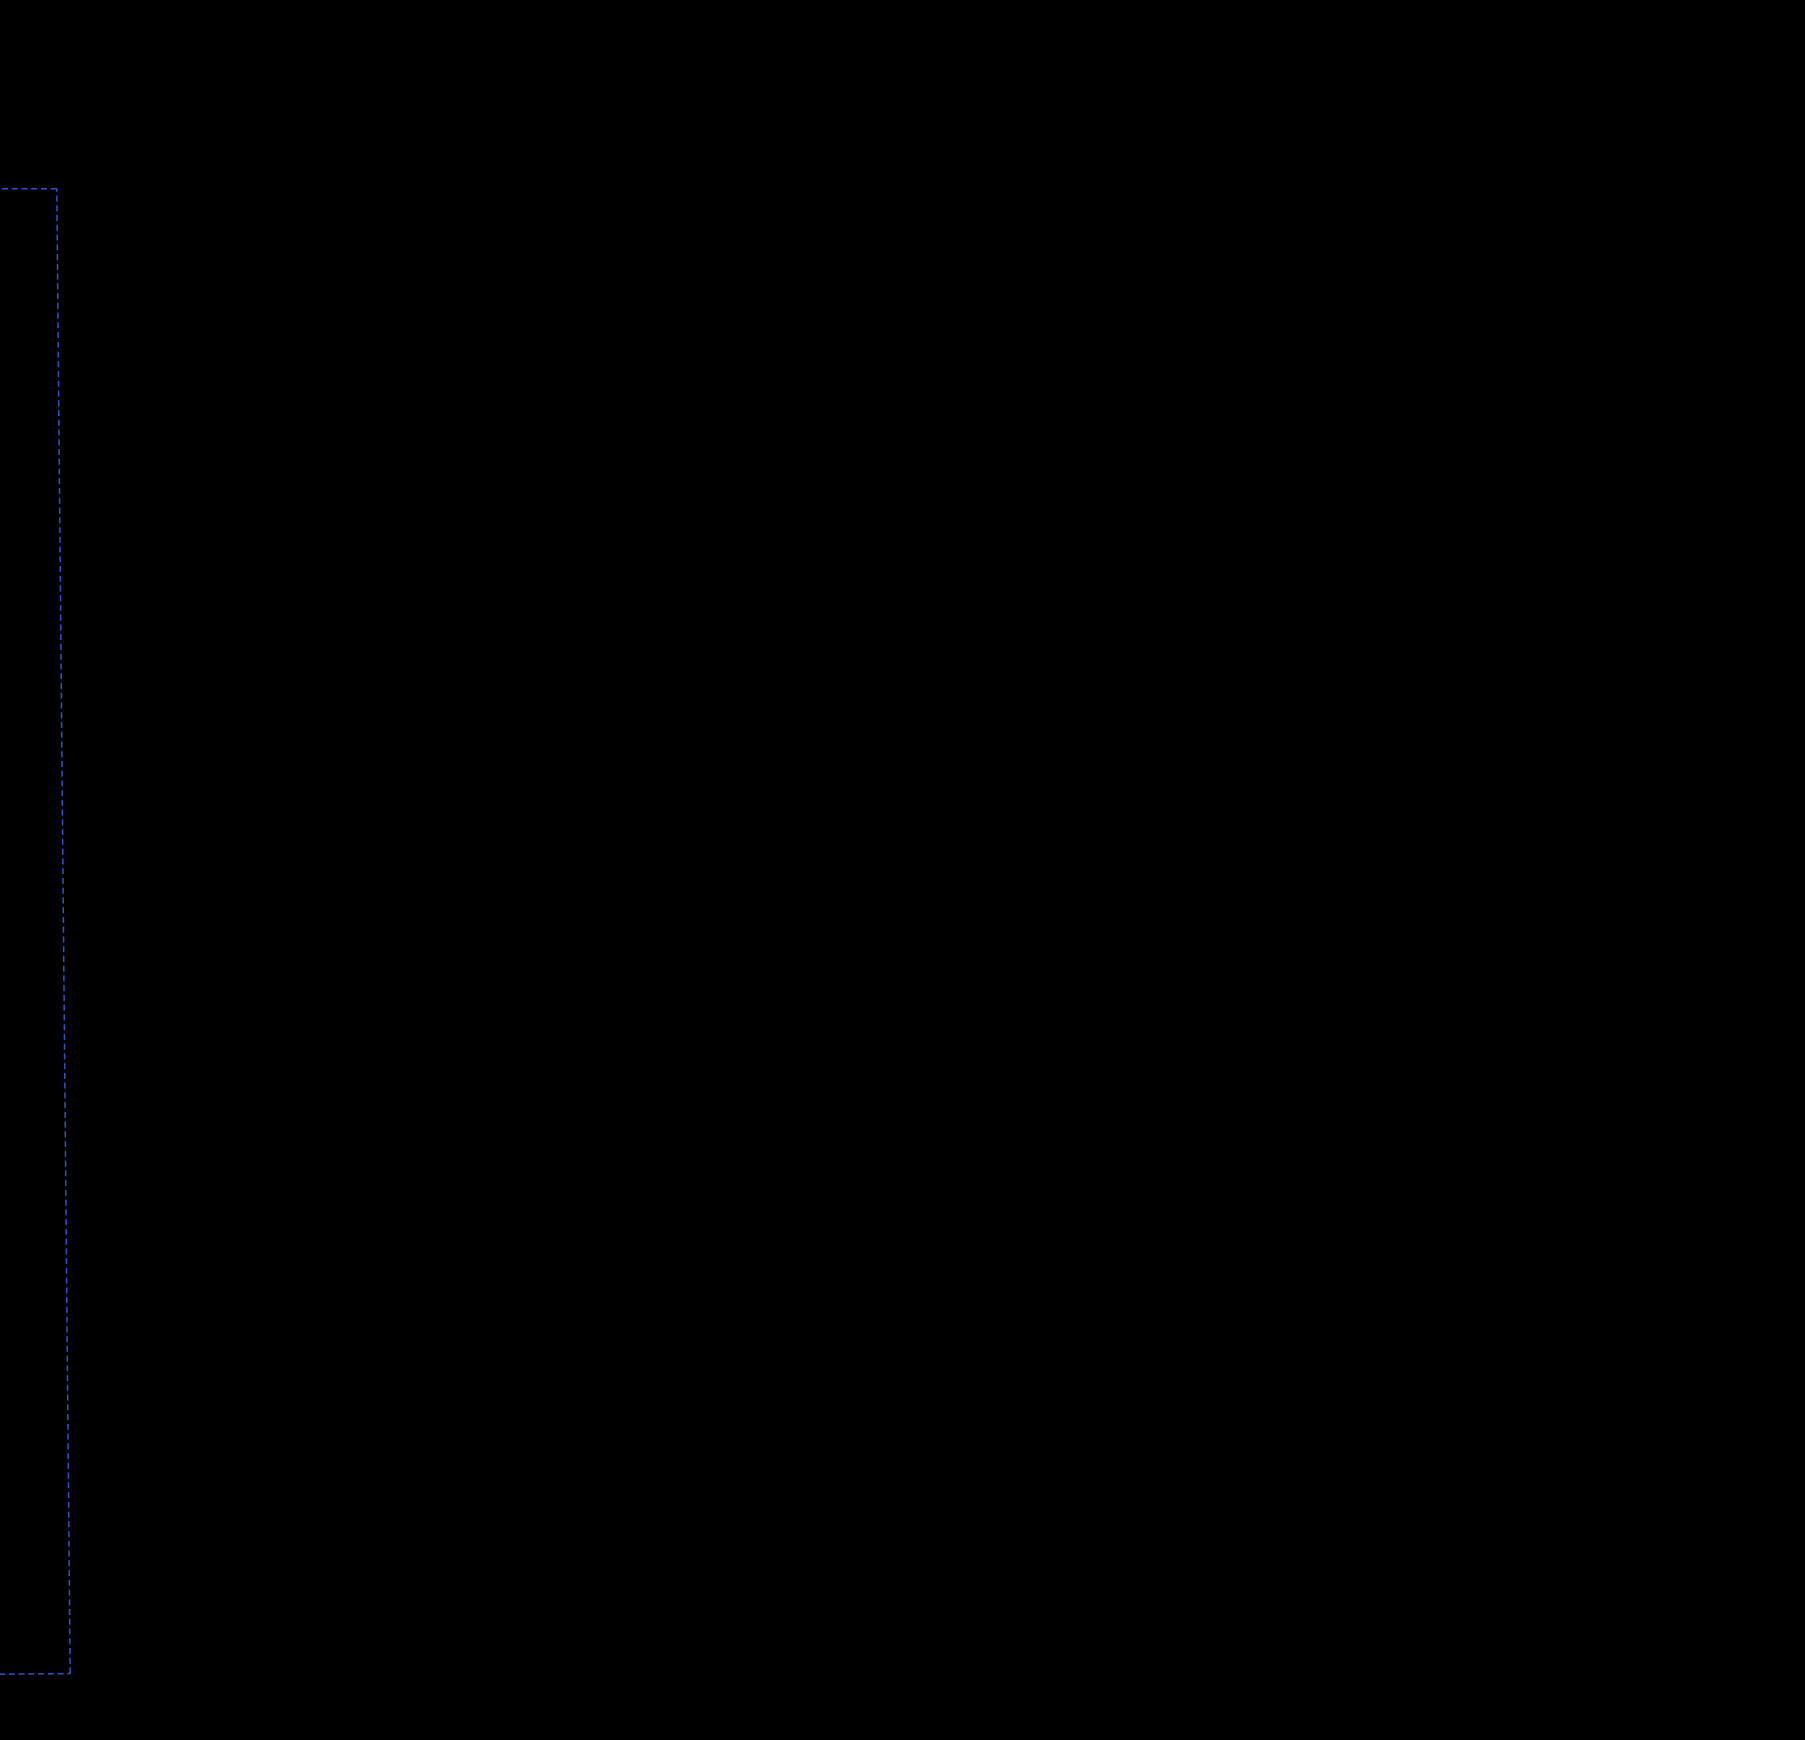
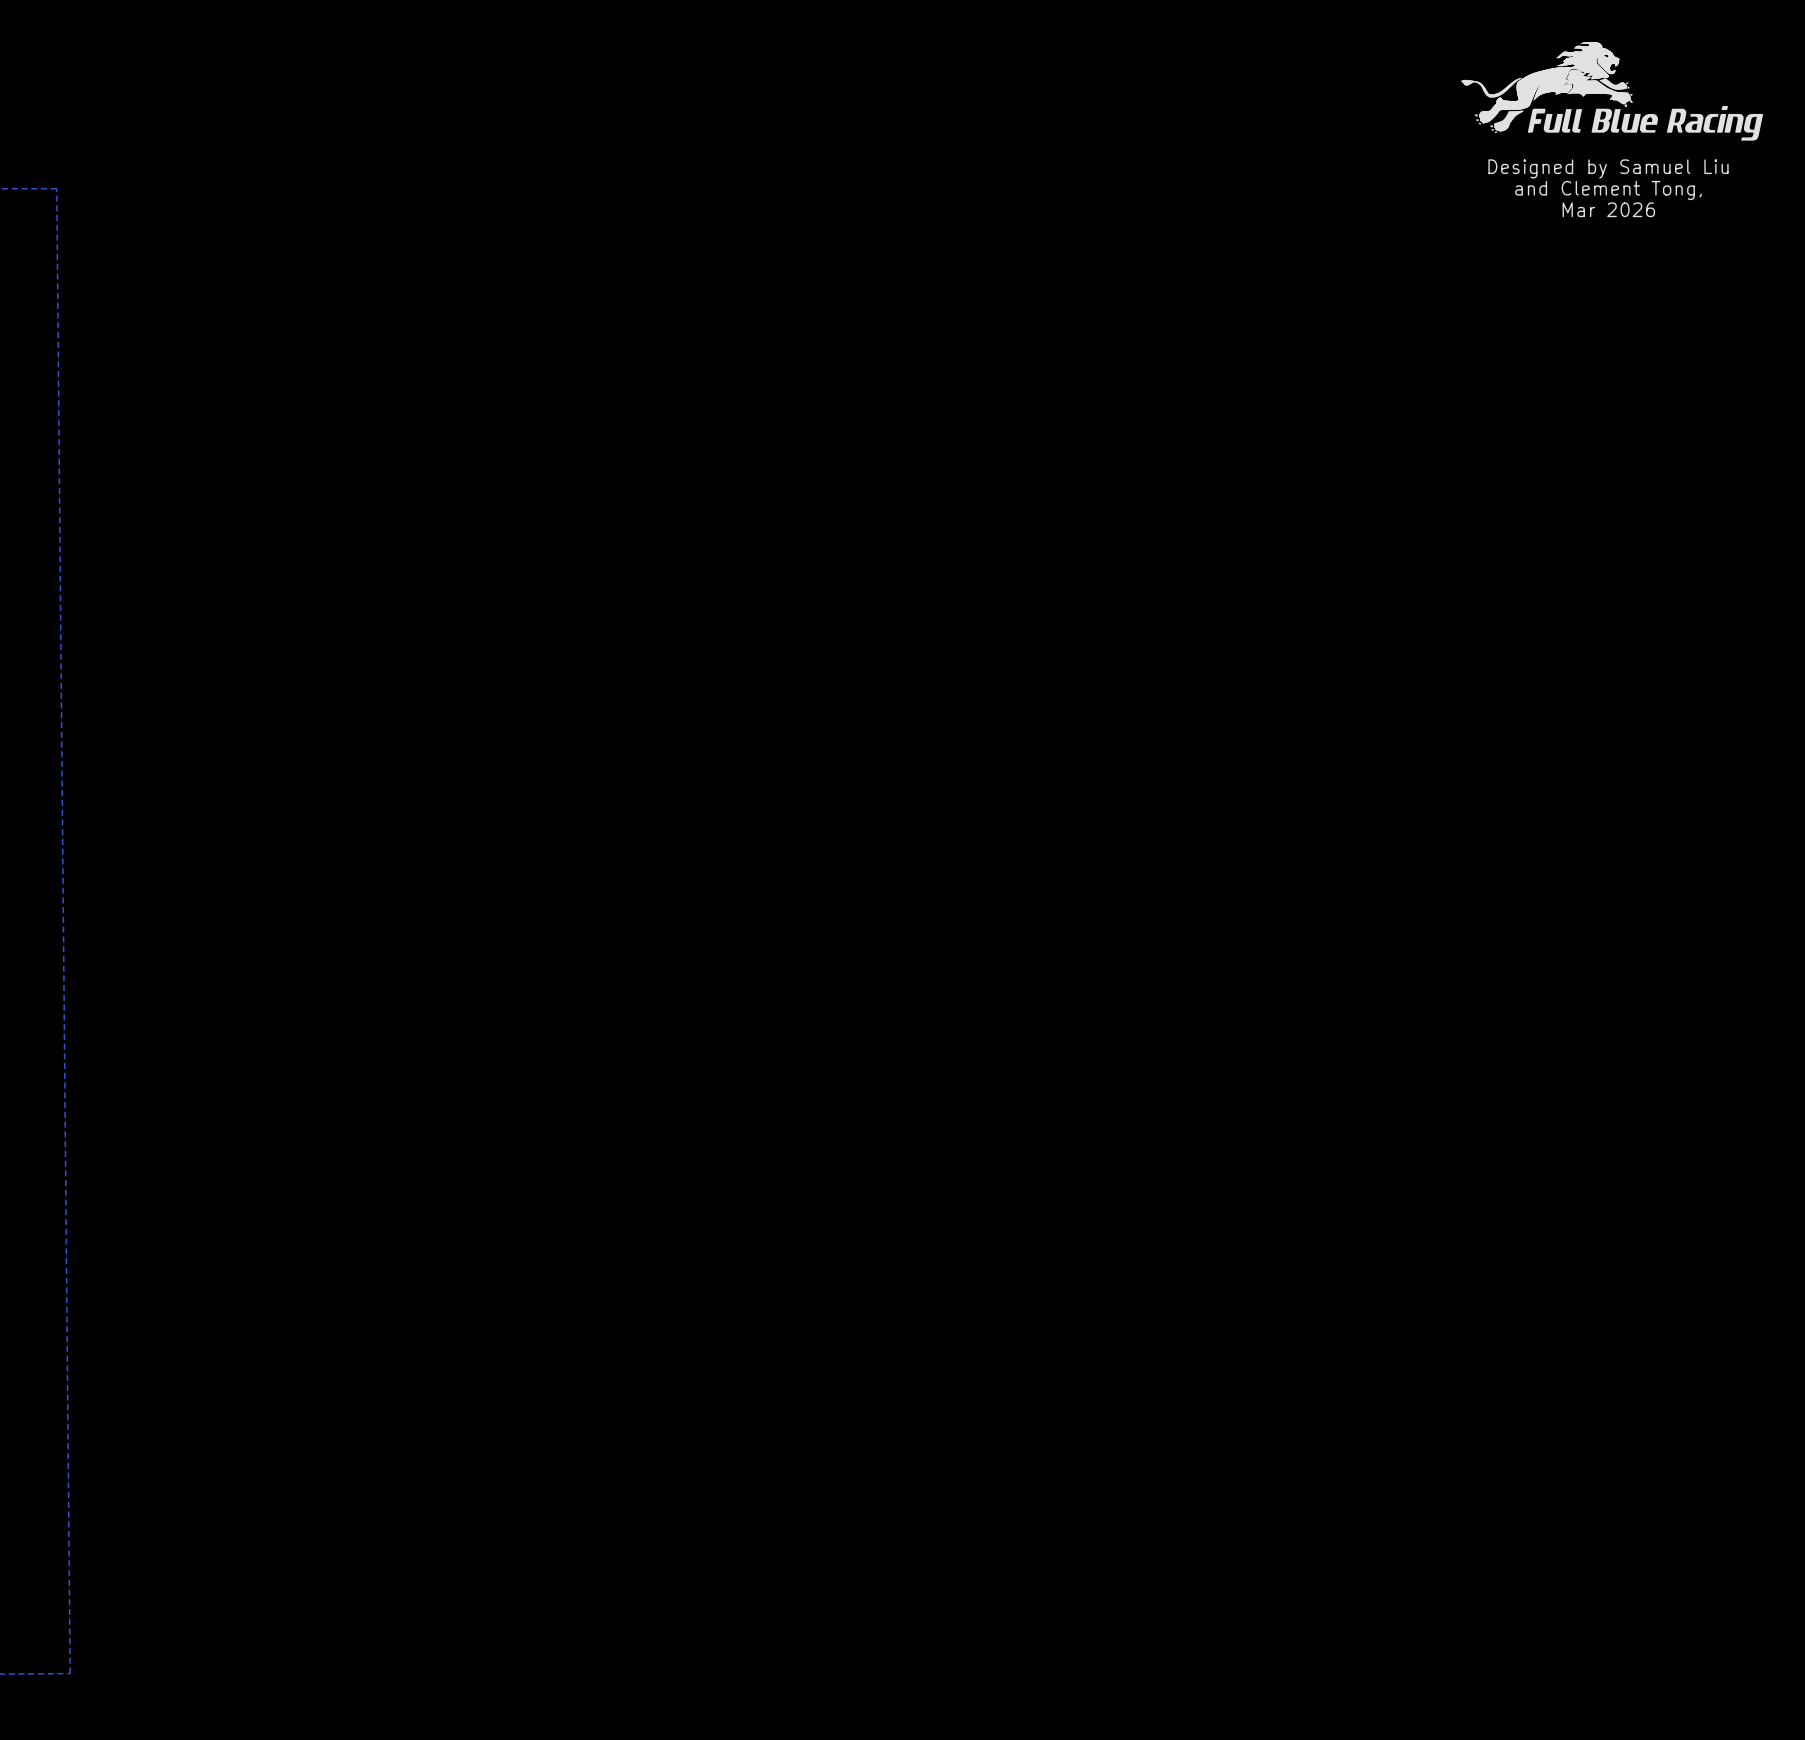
drawing: none -> [1461, 41, 1764, 141]
text: none -> Designed by Samuel Liu (1608, 168)
text: none -> and Clement Tong, (1608, 190)
text: none -> Mar 2026 (1608, 209)

